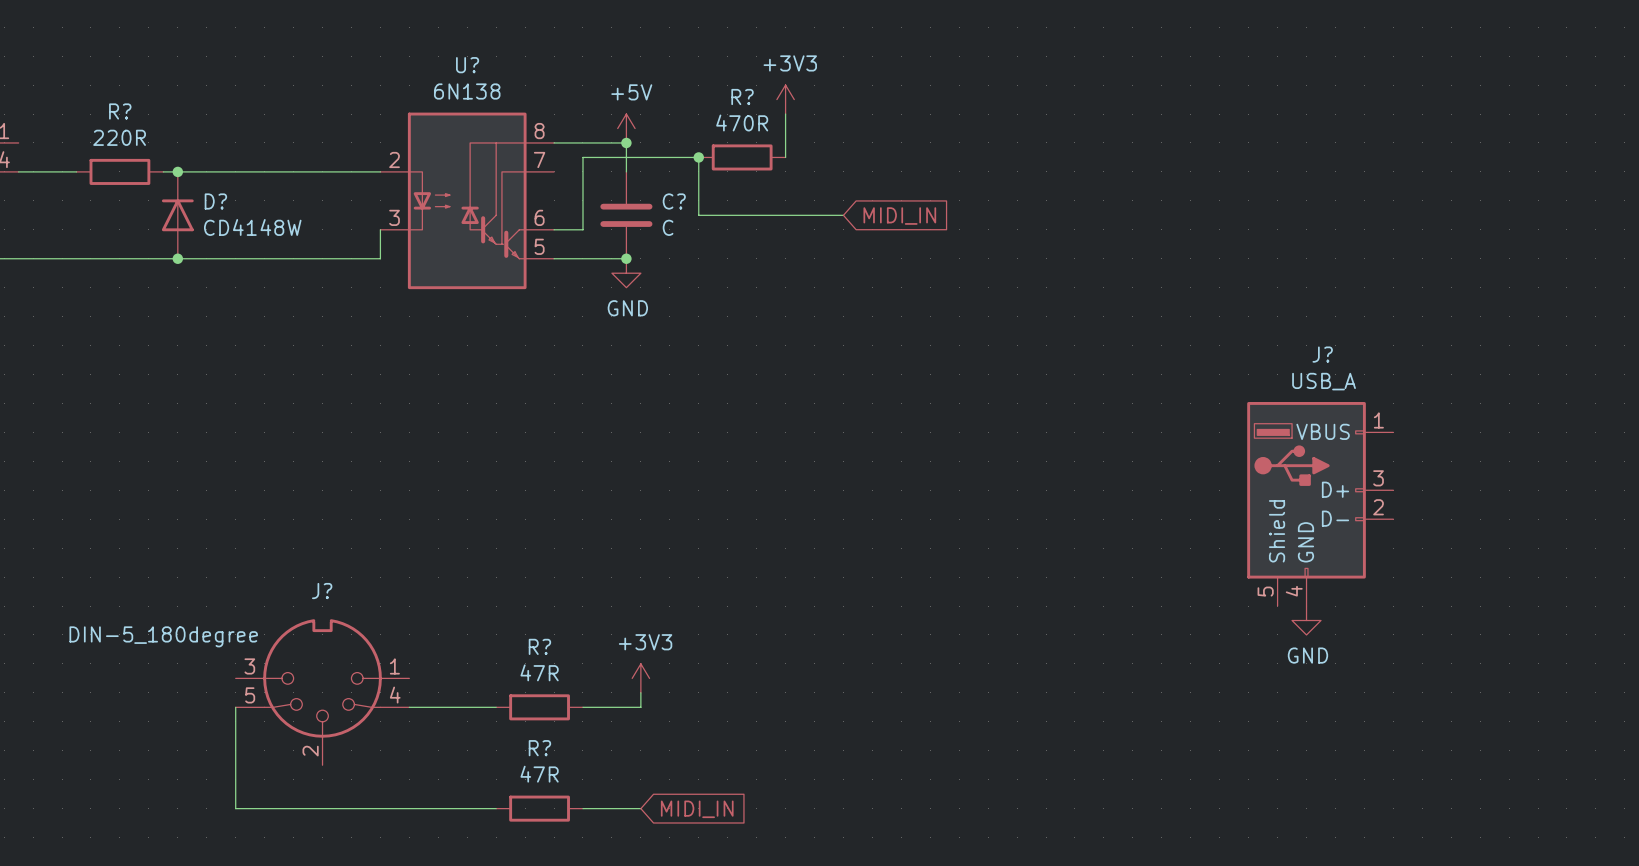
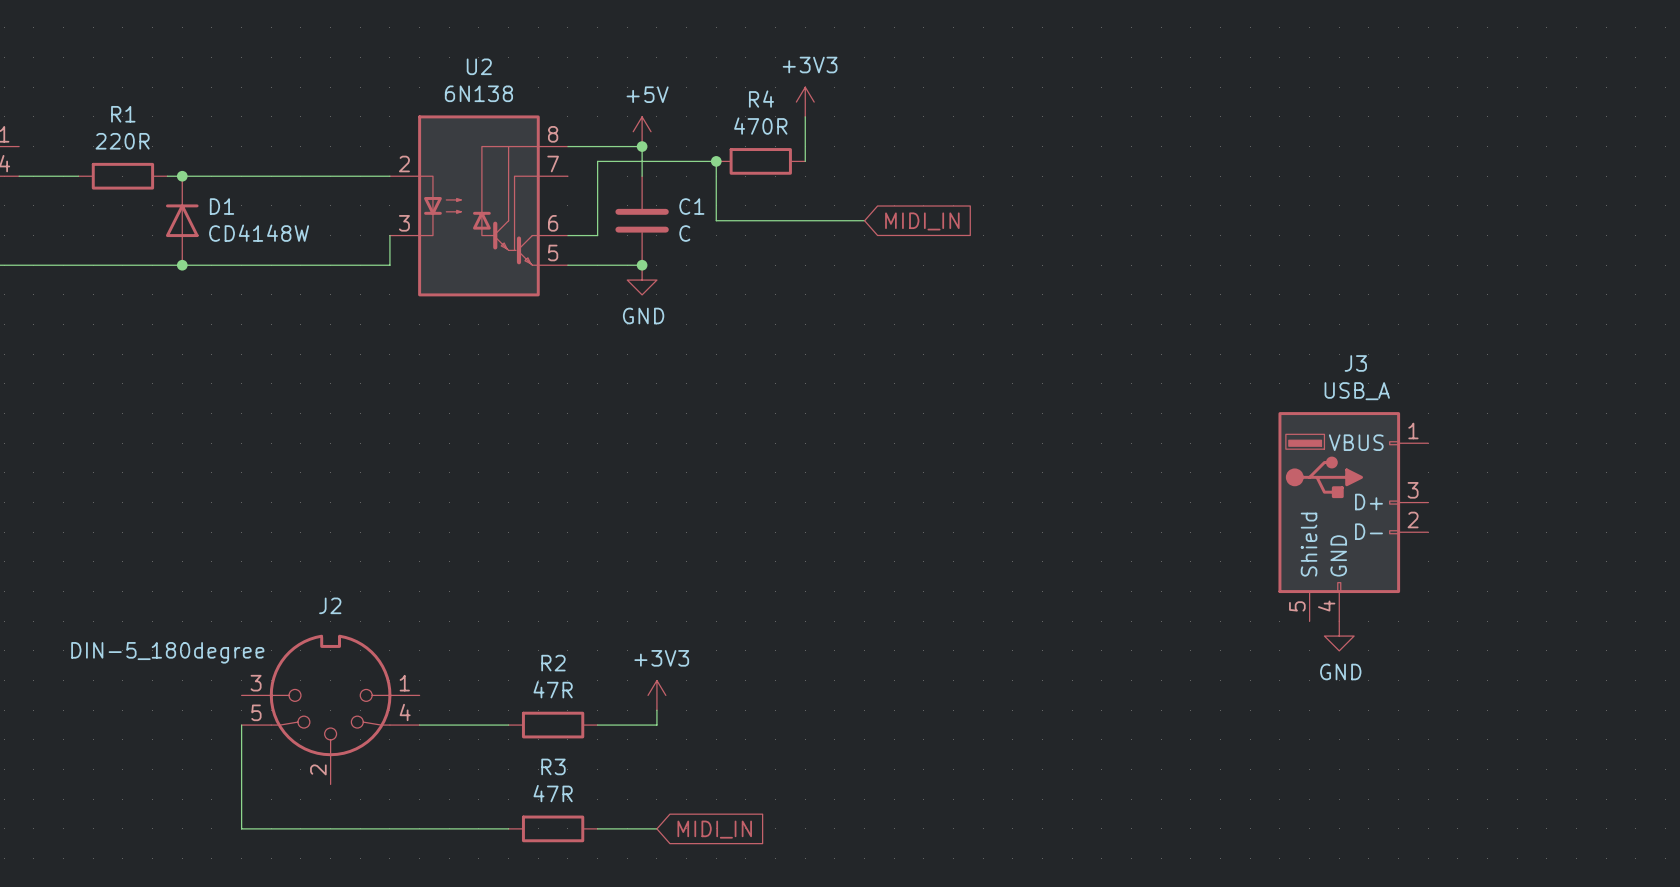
U? name: U? (467, 65) -> U2 (479, 66)
R? name: R? (742, 97) -> R4 (761, 99)
R? name: R? (120, 111) -> R1 (123, 114)
D? name: D? (215, 201) -> D1 (222, 206)
C? name: C? (674, 201) -> C1 (691, 206)
J? name: J? (1322, 354) -> J3 (1355, 363)
J? name: J? (322, 591) -> J2 (330, 605)
R? name: R? (539, 646) -> R2 (553, 663)
R? name: R? (539, 748) -> R3 (553, 766)

